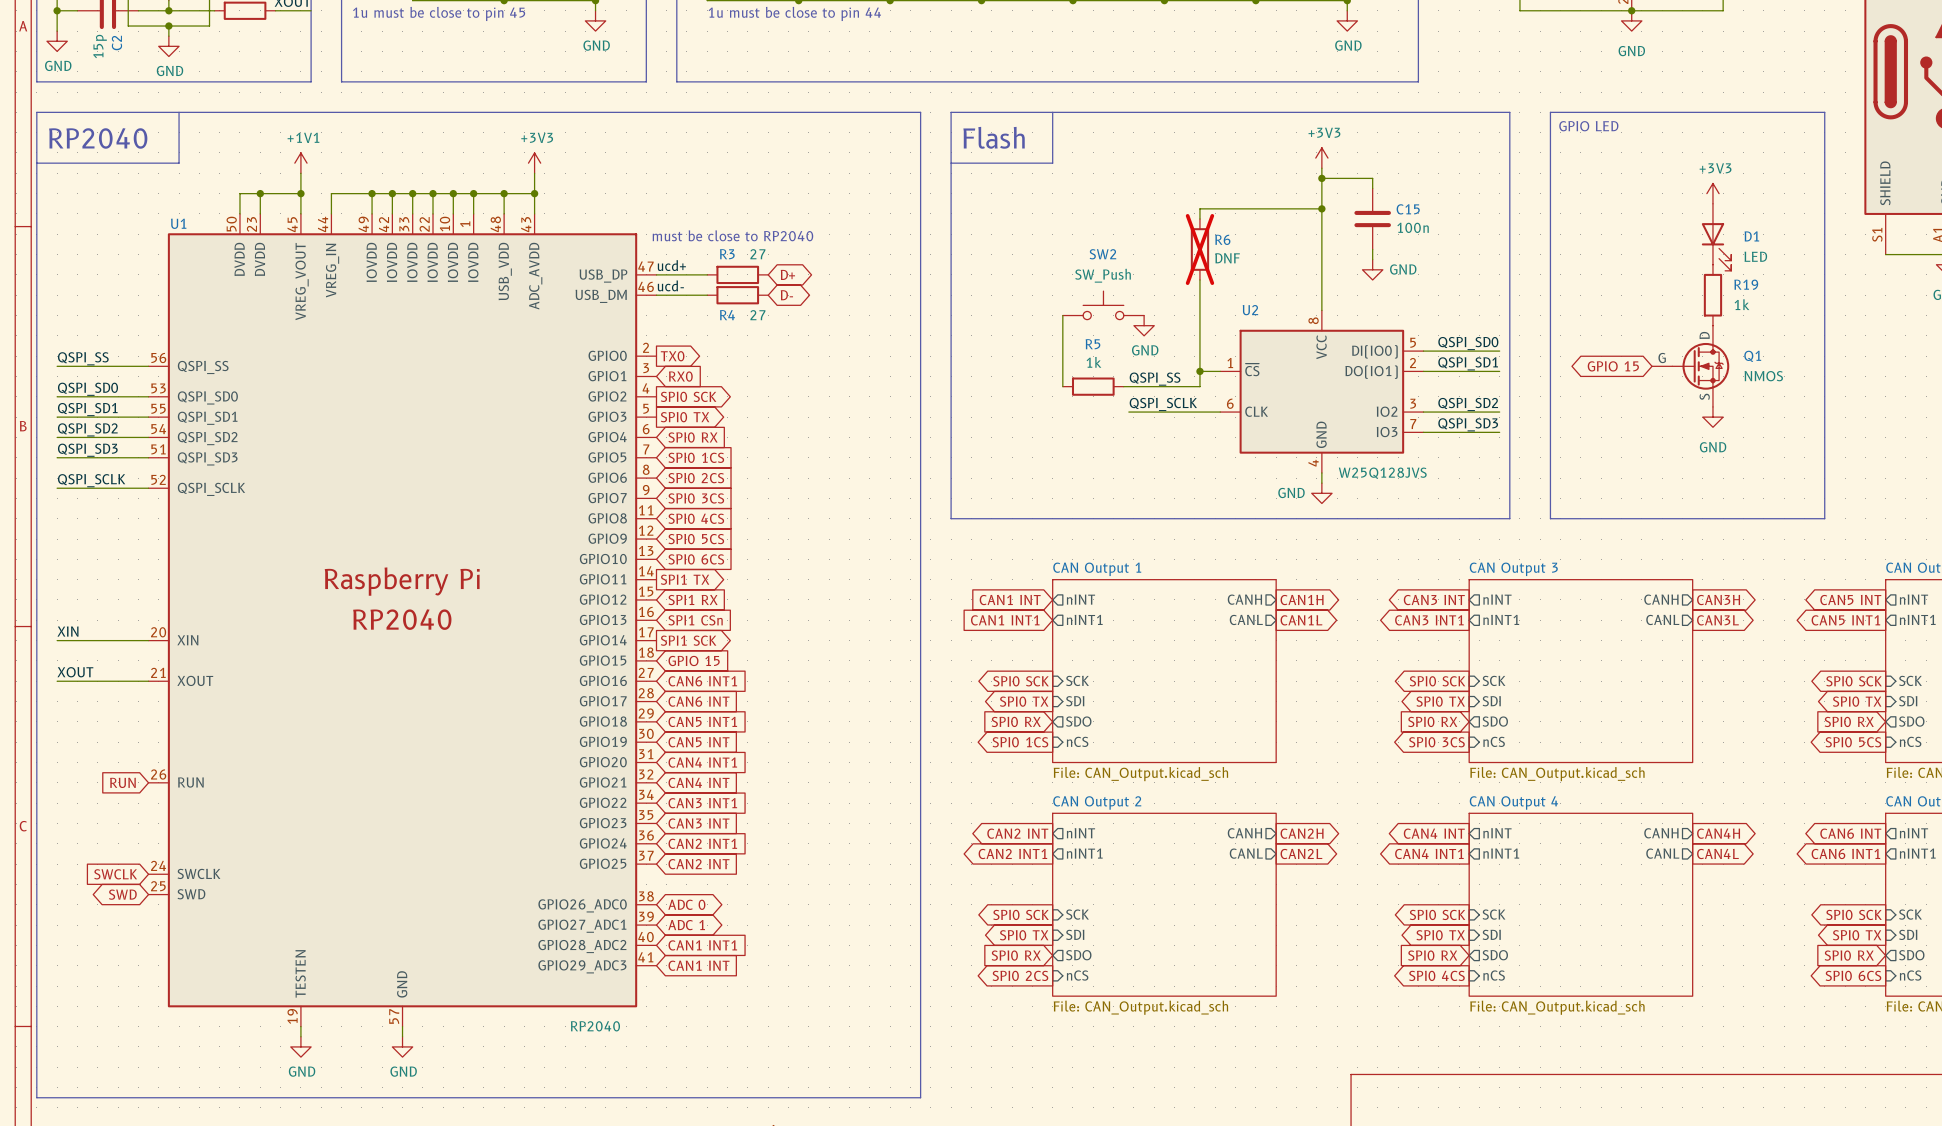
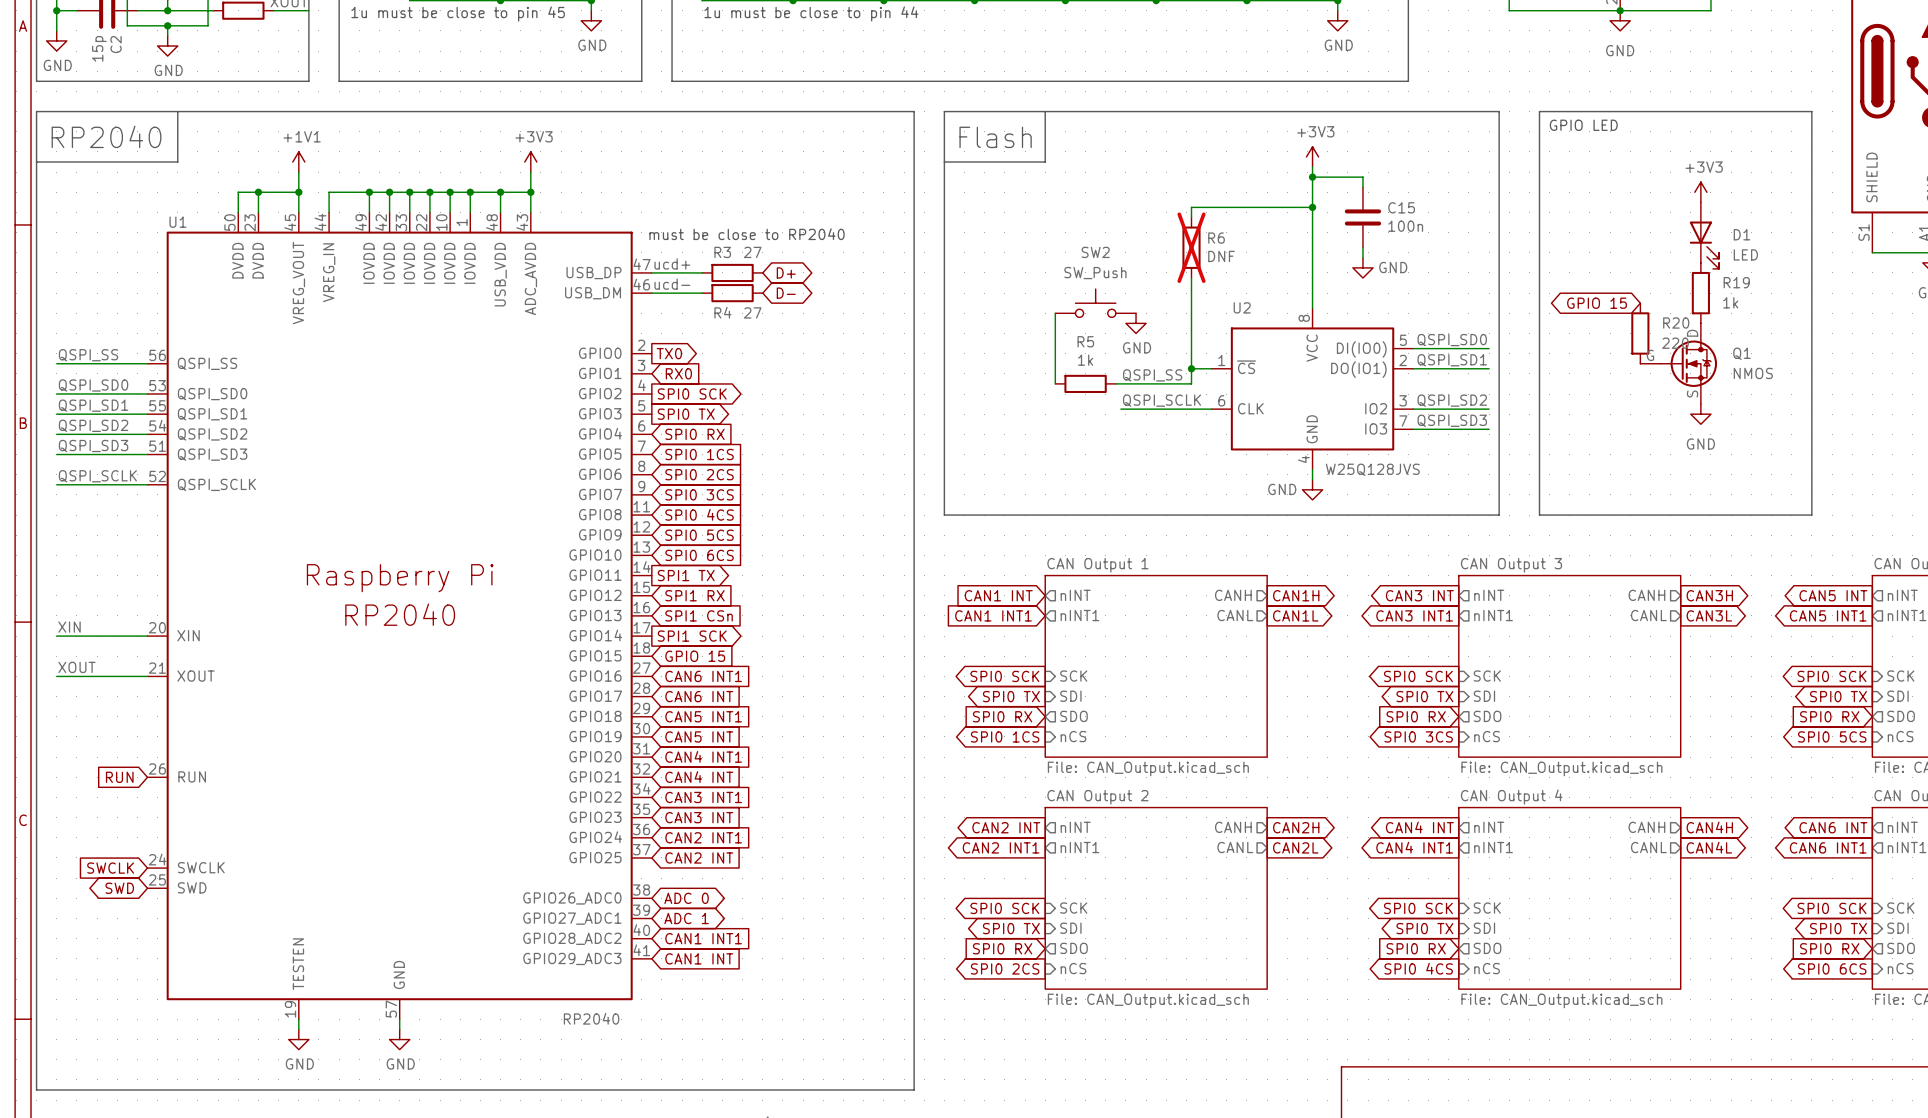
R20: none -> 220 (1640, 333)
global label position: GPIO 15 (1613, 366) -> GPIO 15 (1597, 303)

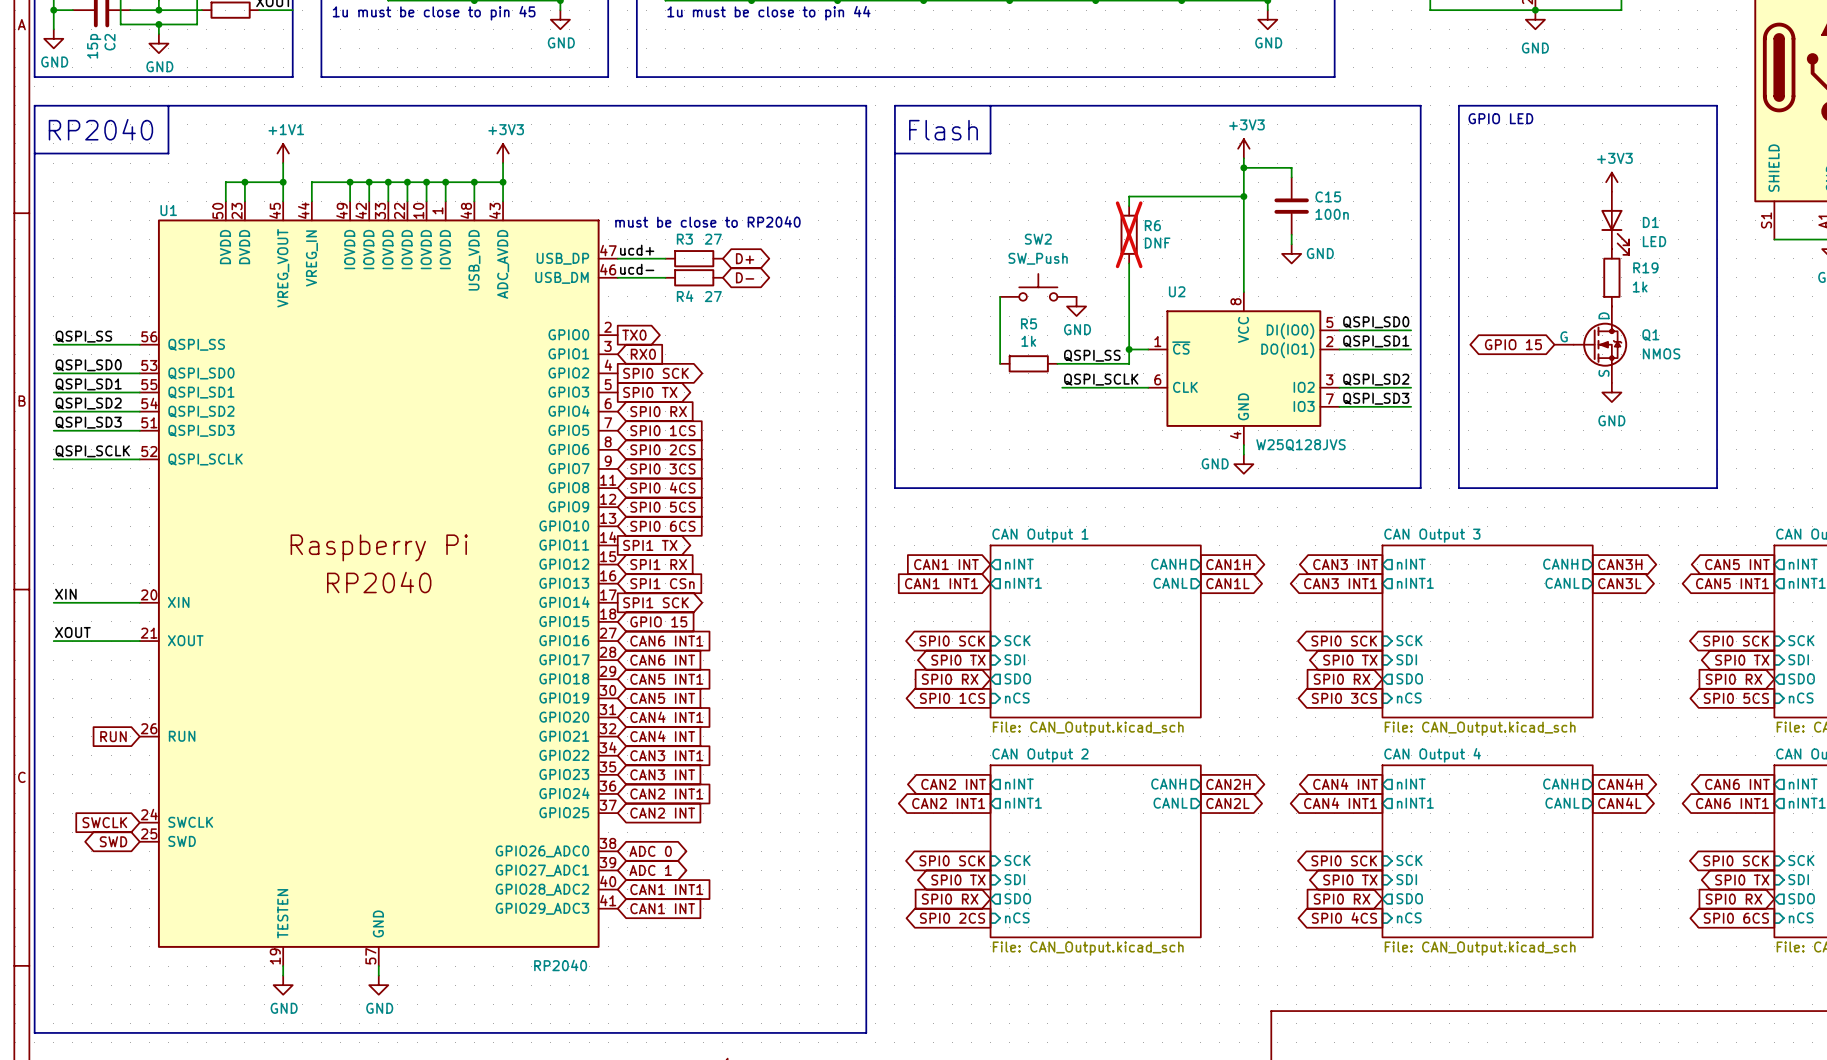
global label position: GPIO 15 (1597, 303) -> GPIO 15 (1513, 344)
R20: 220 (1640, 333) -> none

